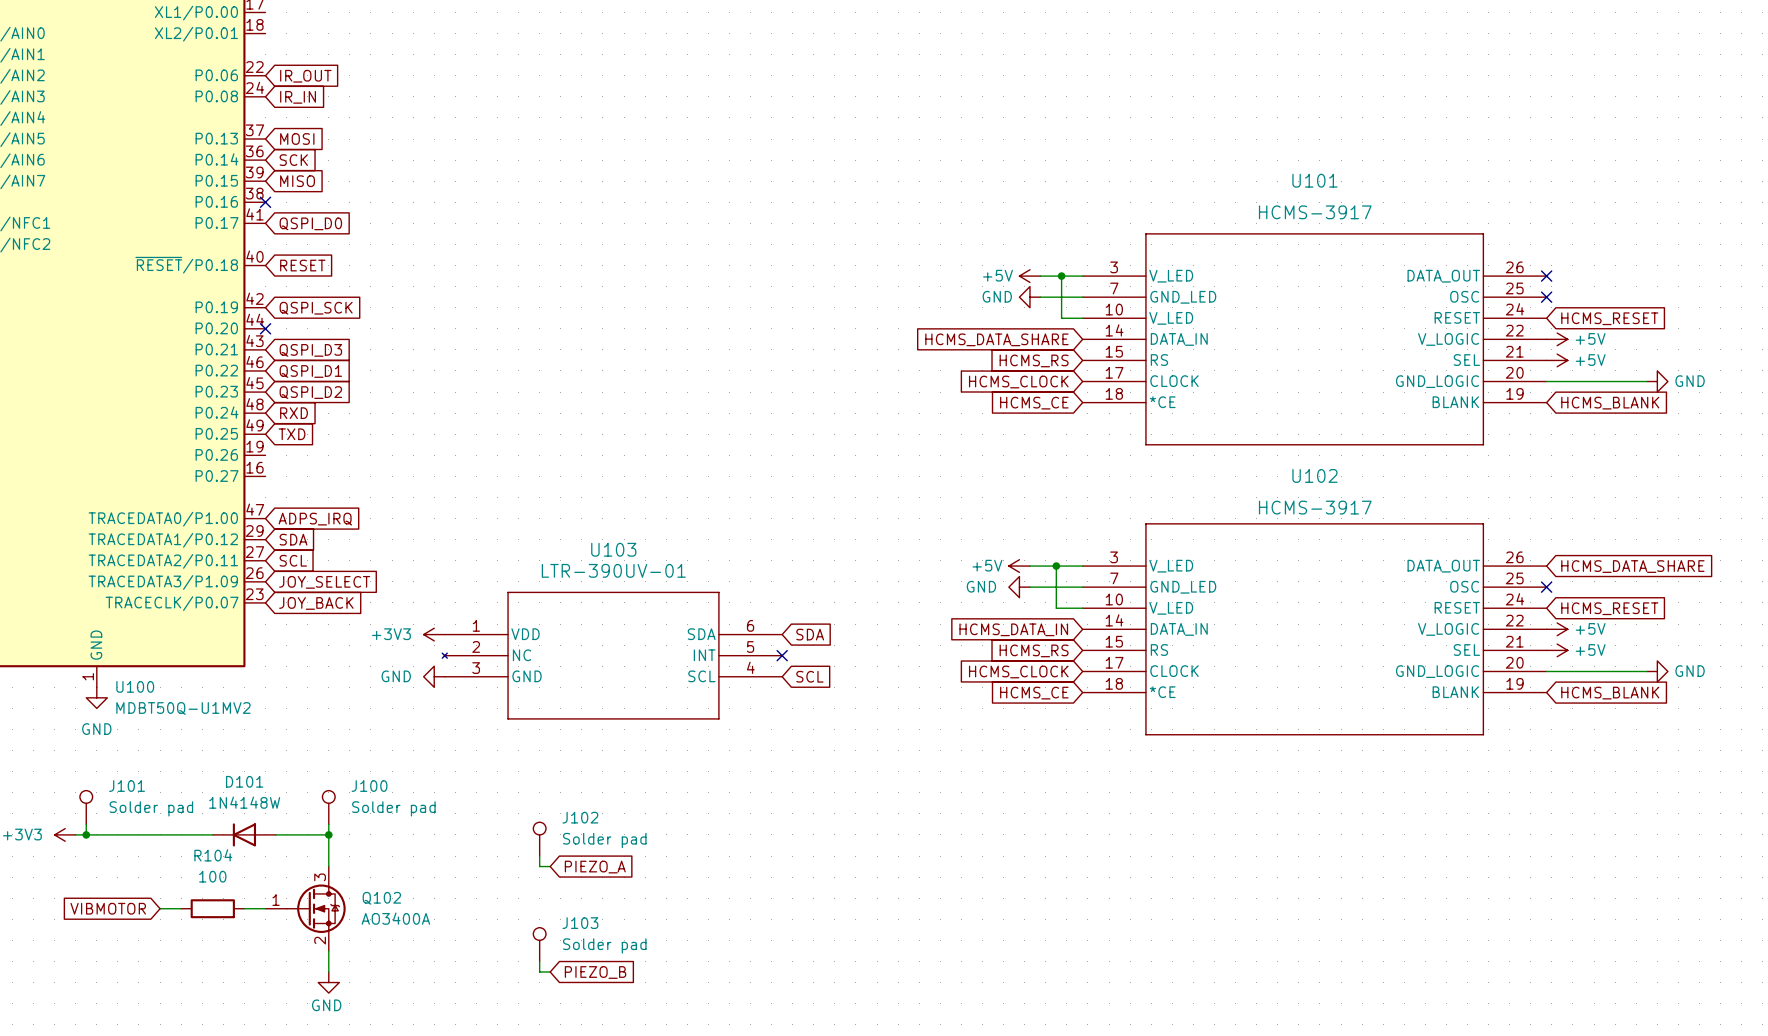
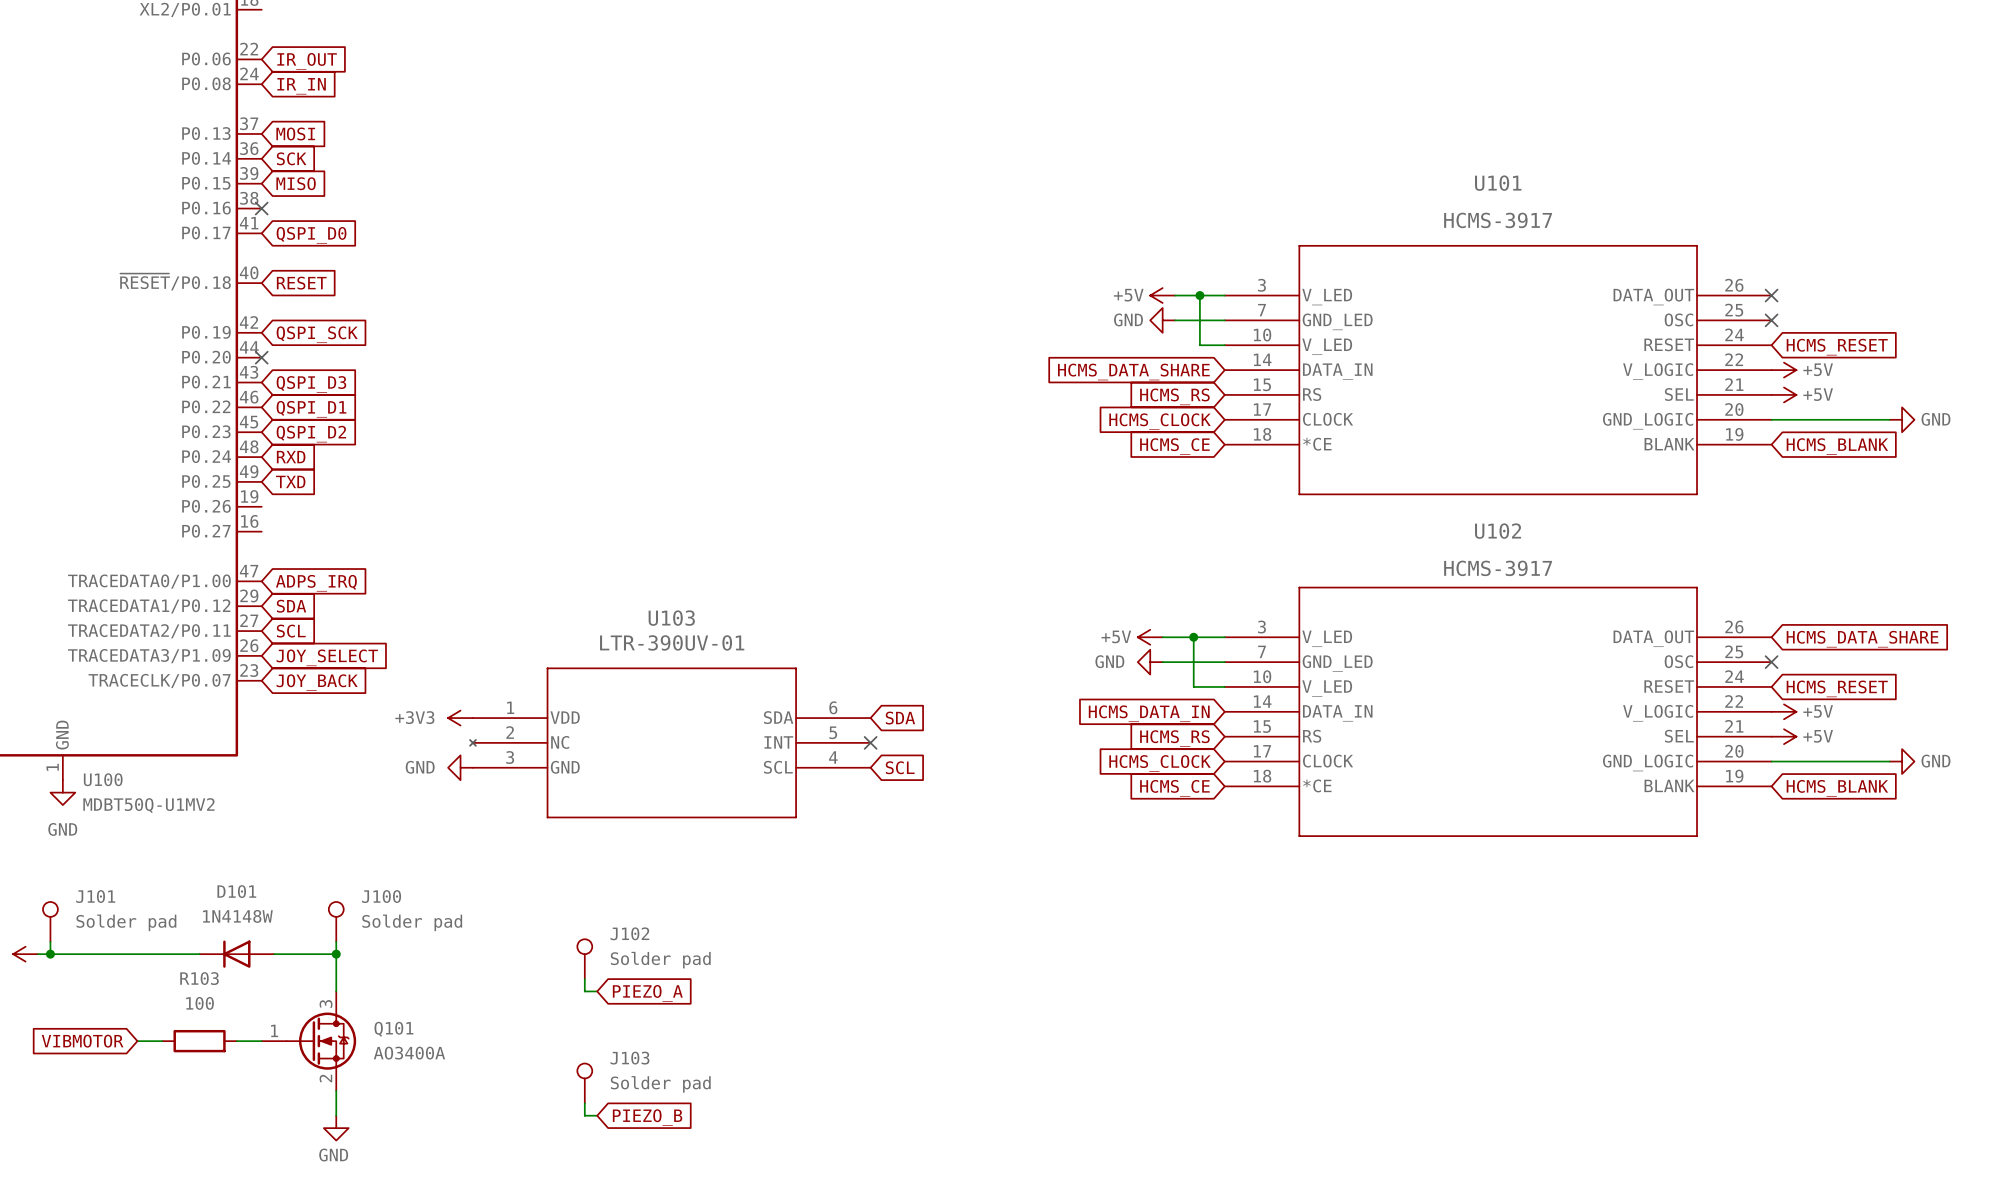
R104 name: R104 (213, 855) -> R103 (199, 978)
Q102 name: Q102 (381, 898) -> Q101 (393, 1029)

